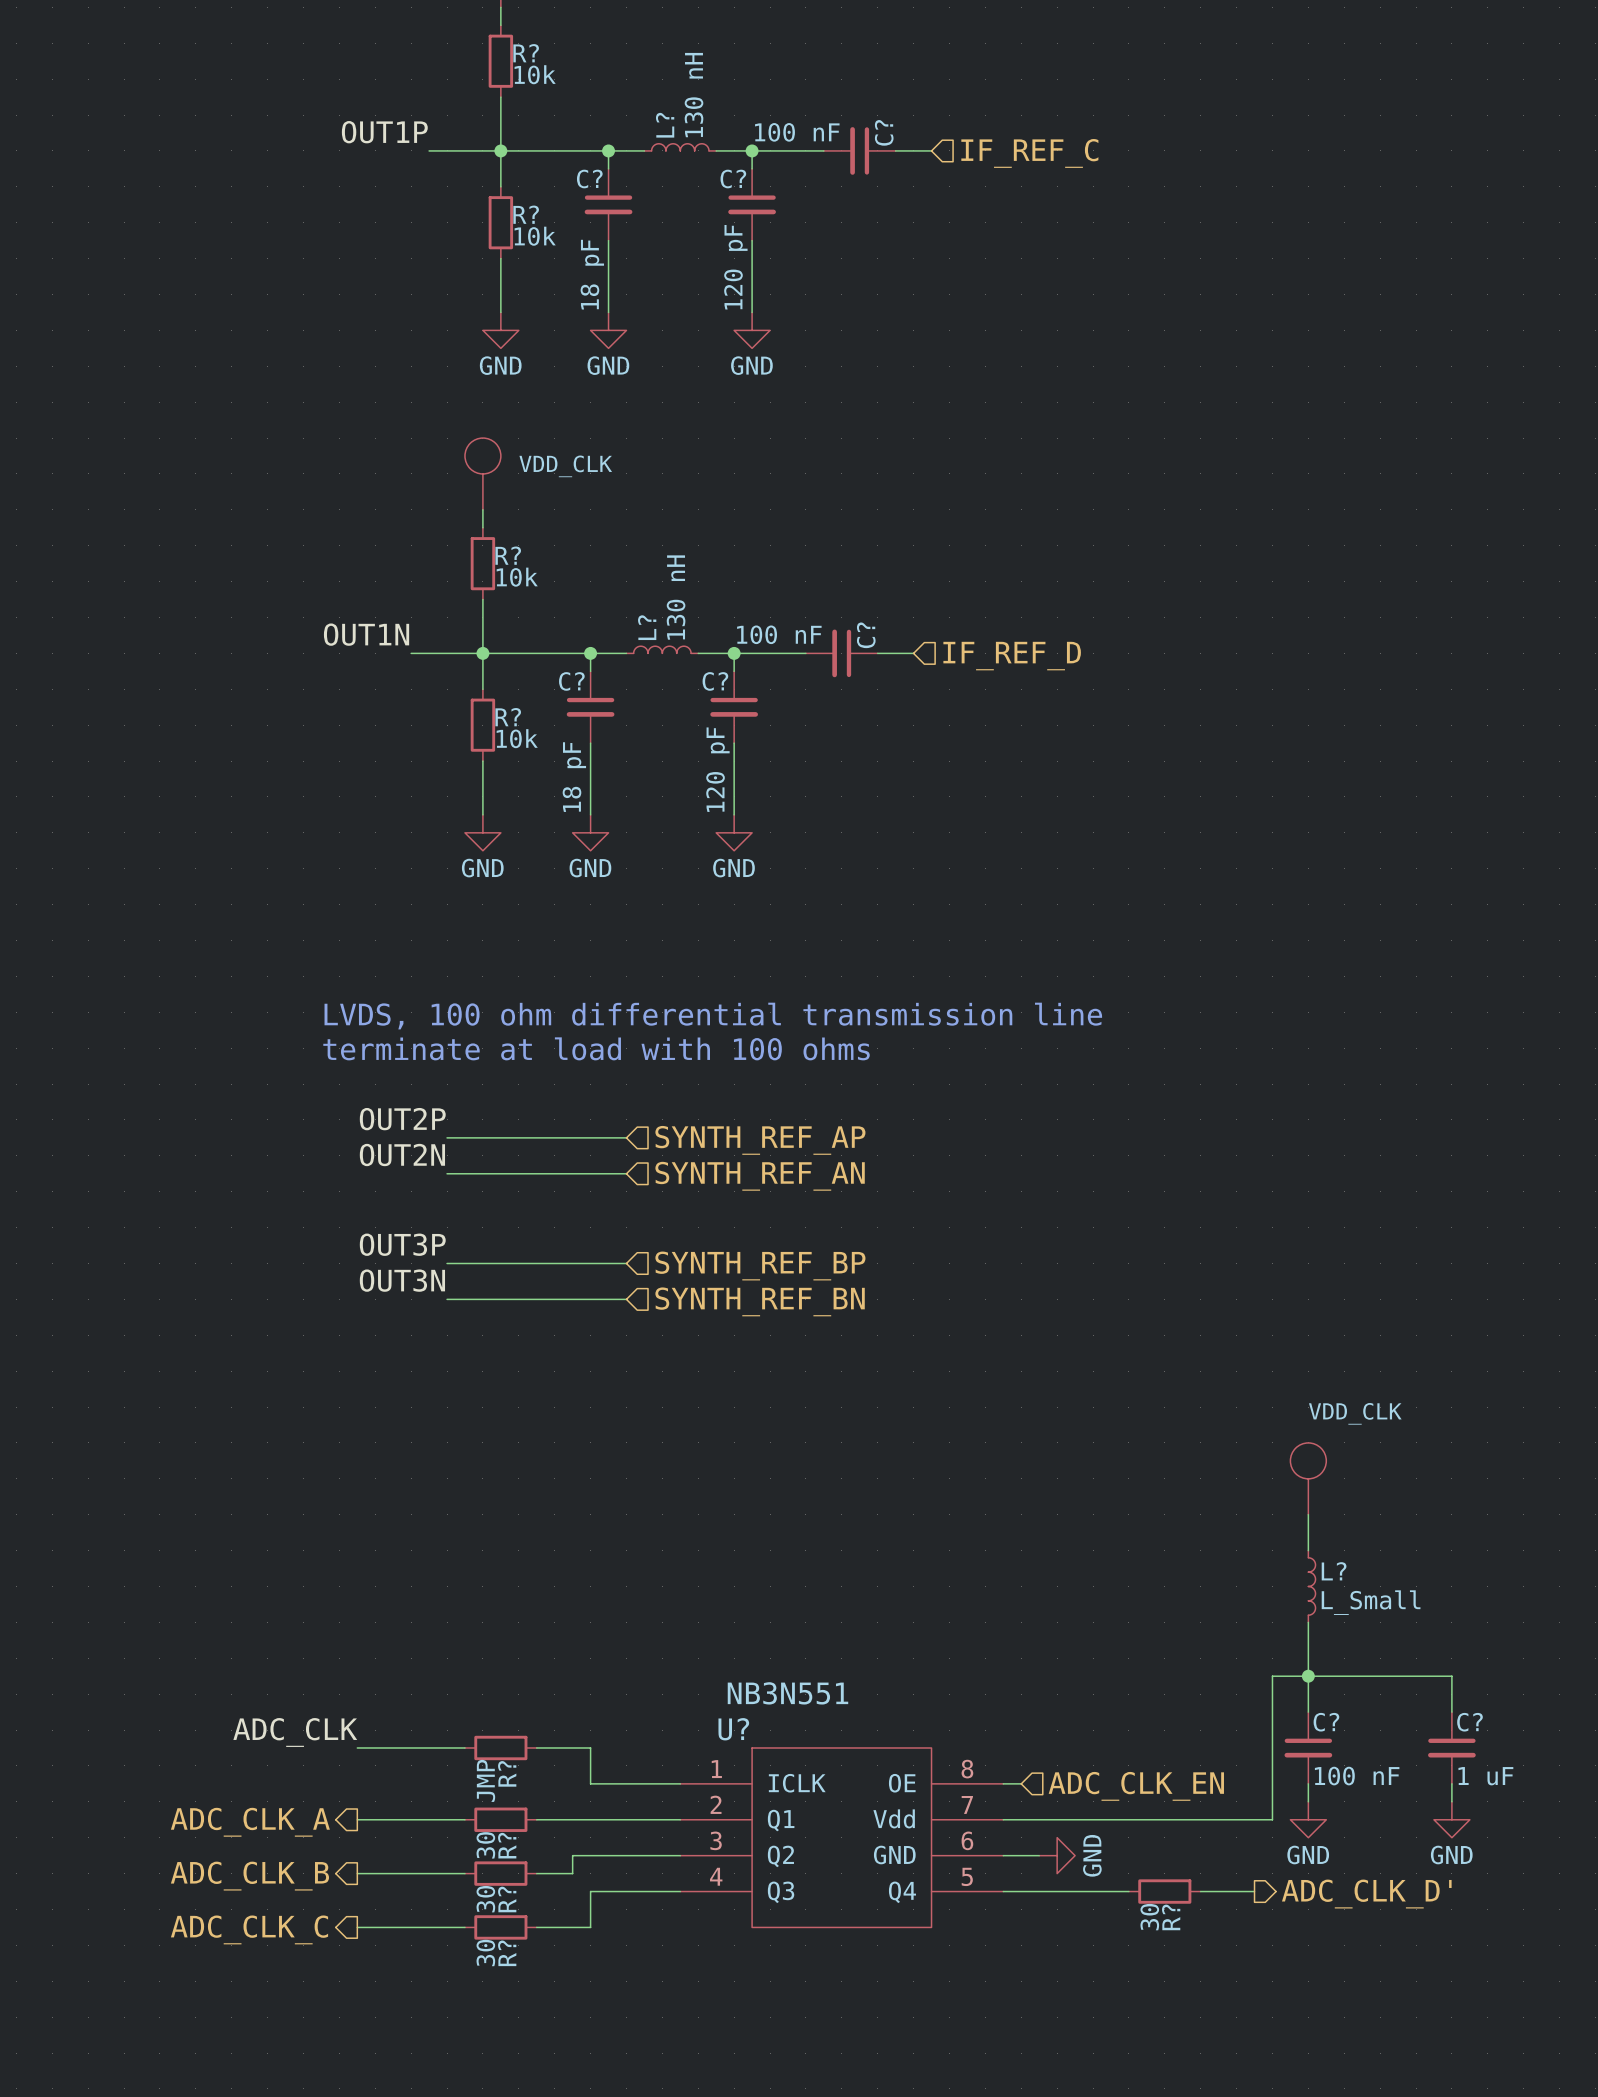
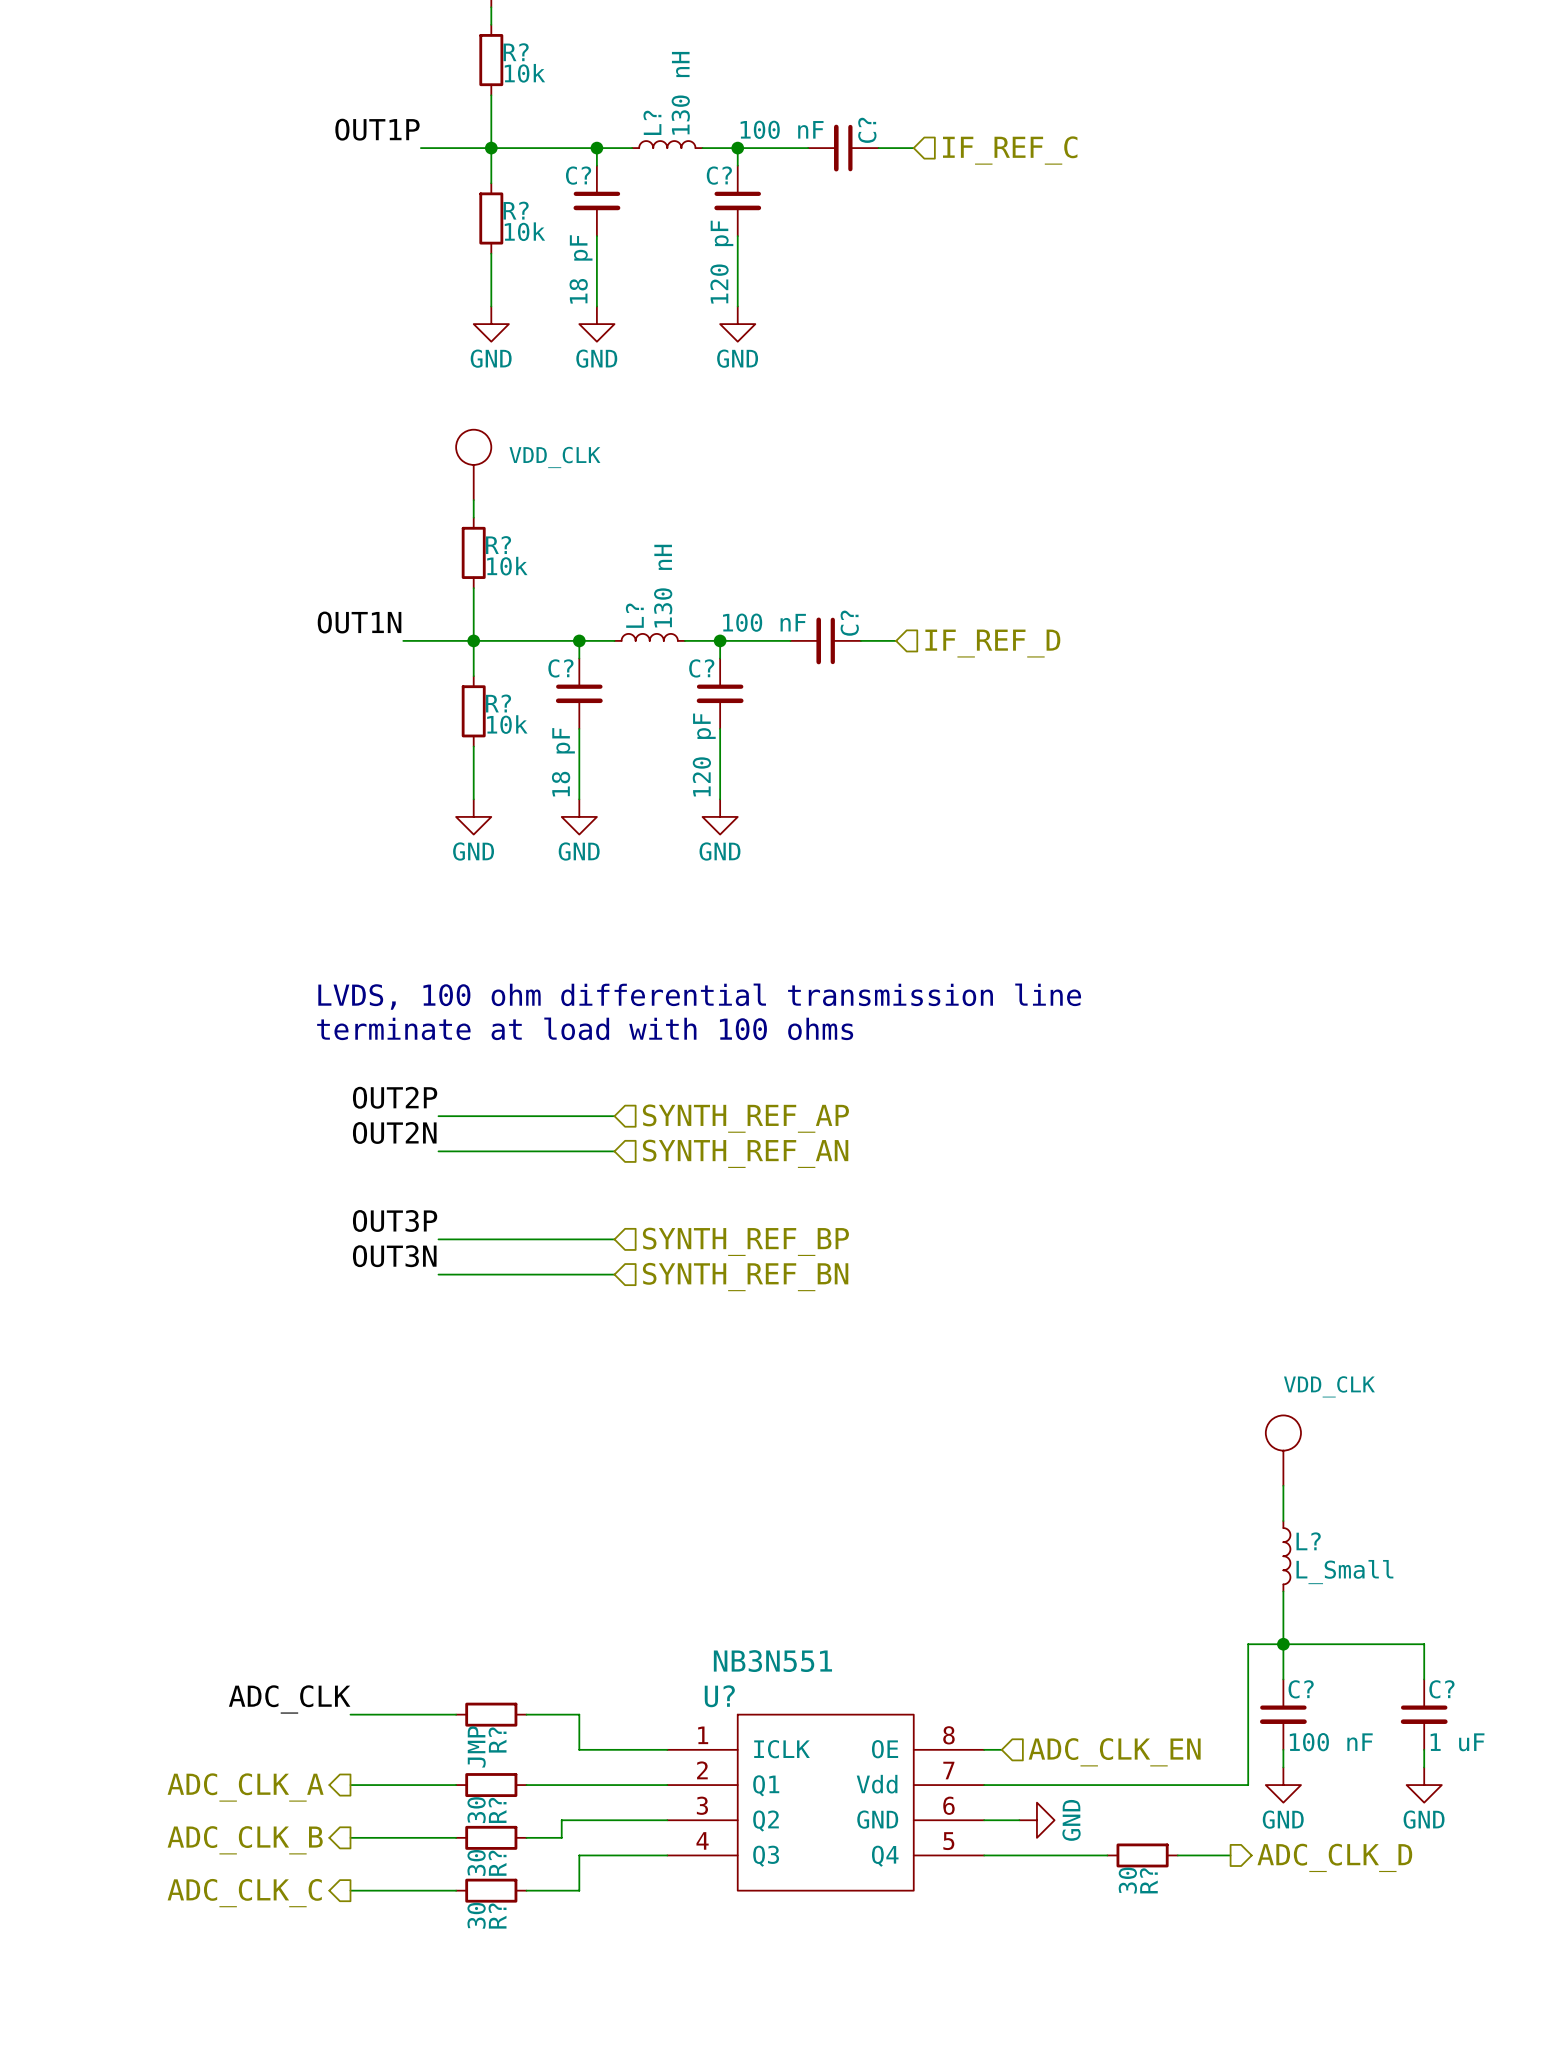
hierarchical label: ADC_CLK_D' (1366, 1894) -> ADC_CLK_D (1334, 1857)

